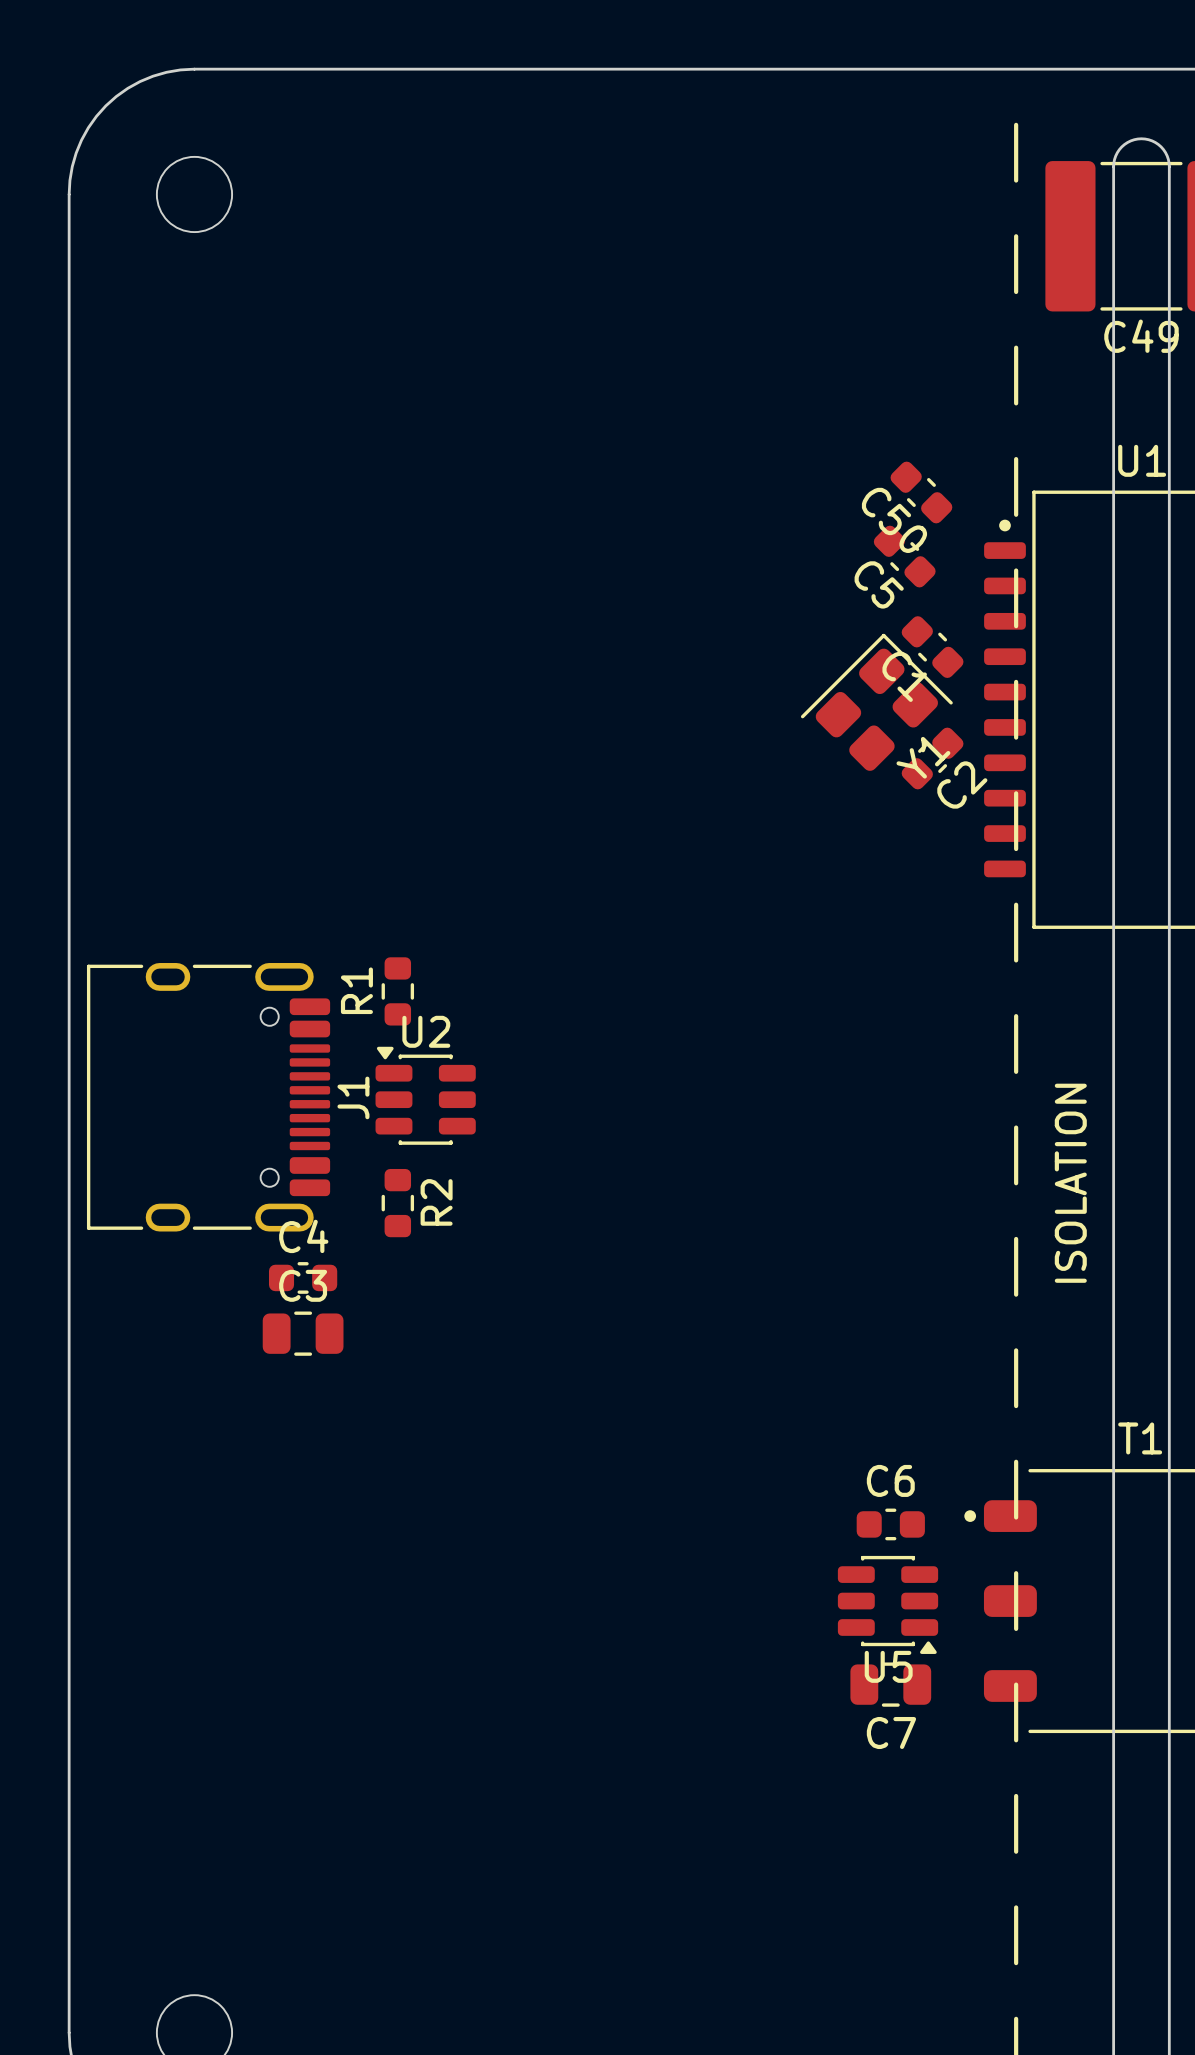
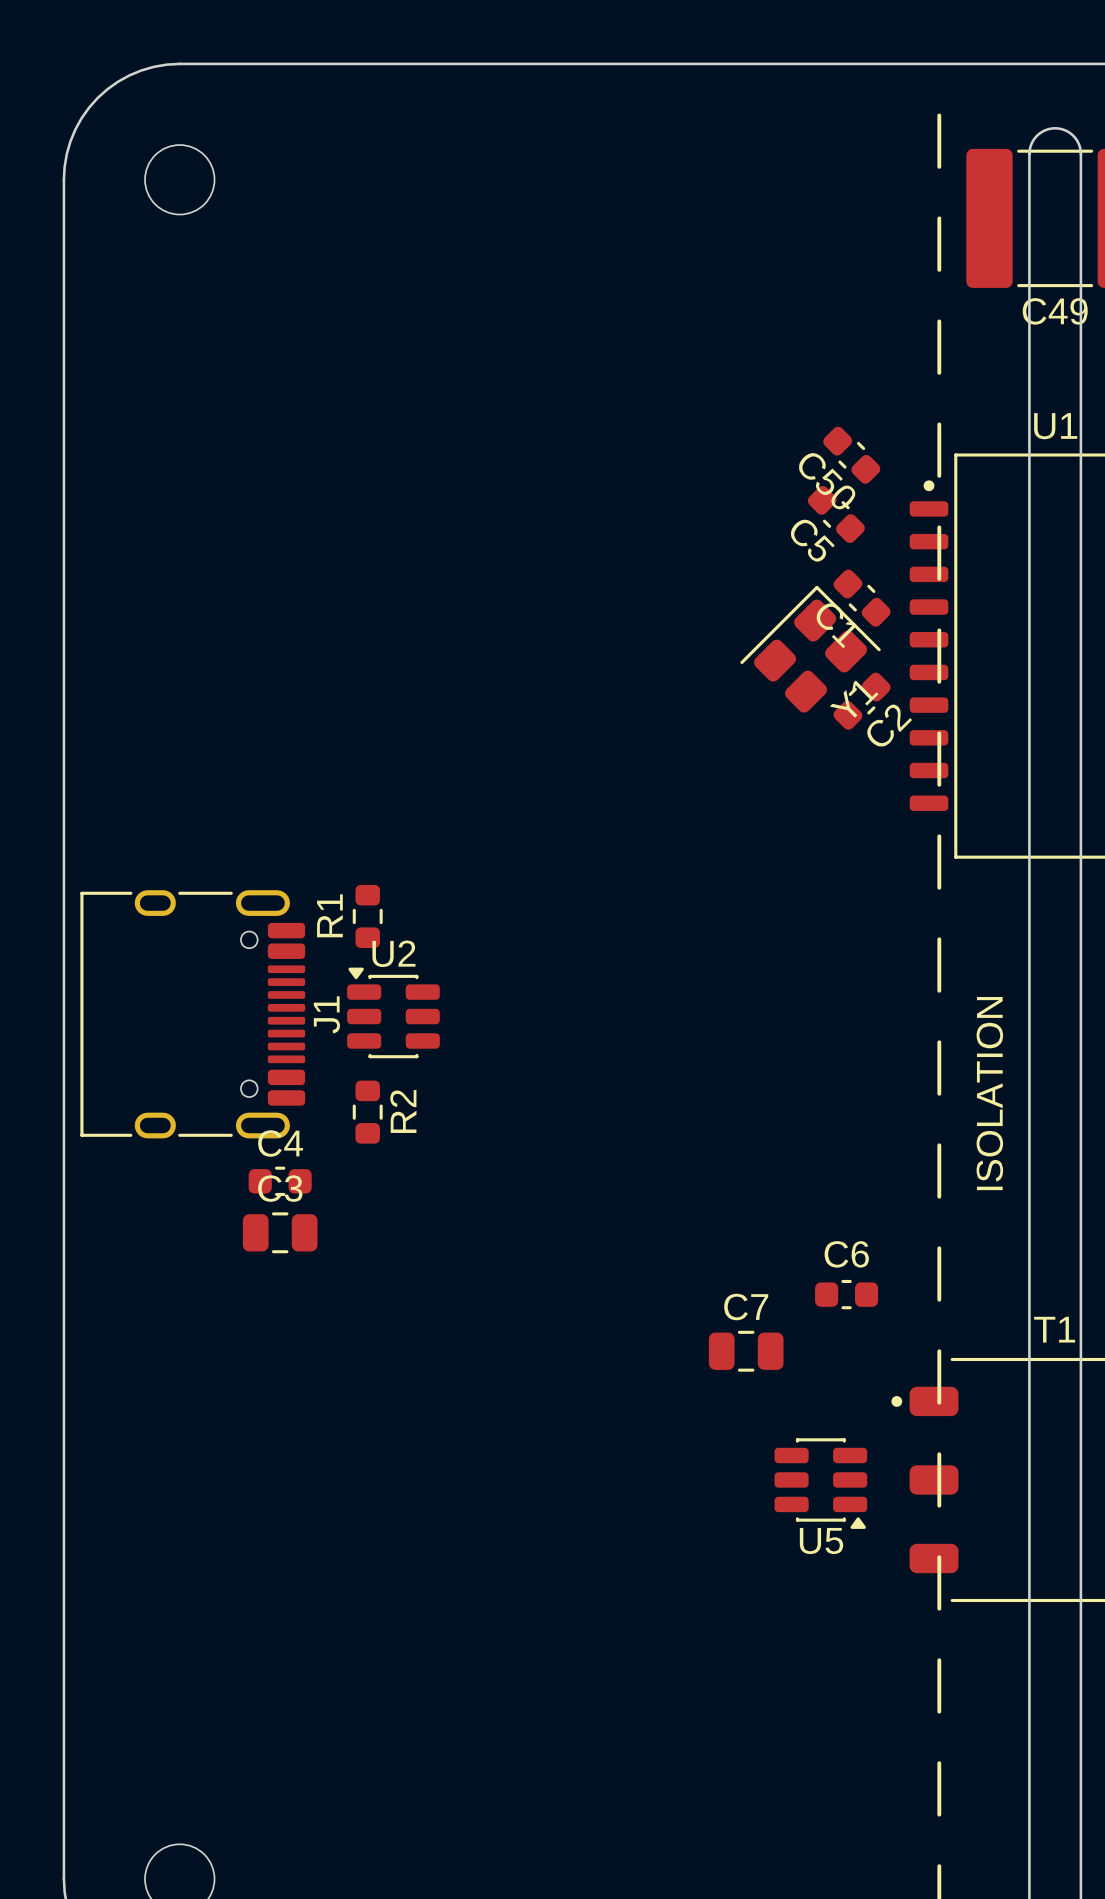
C6 position: (890, 1524) -> (846, 1294)
C7 position: (890, 1684) -> (746, 1351)
C7 name position: C7 (891, 1732) -> C7 (746, 1307)

